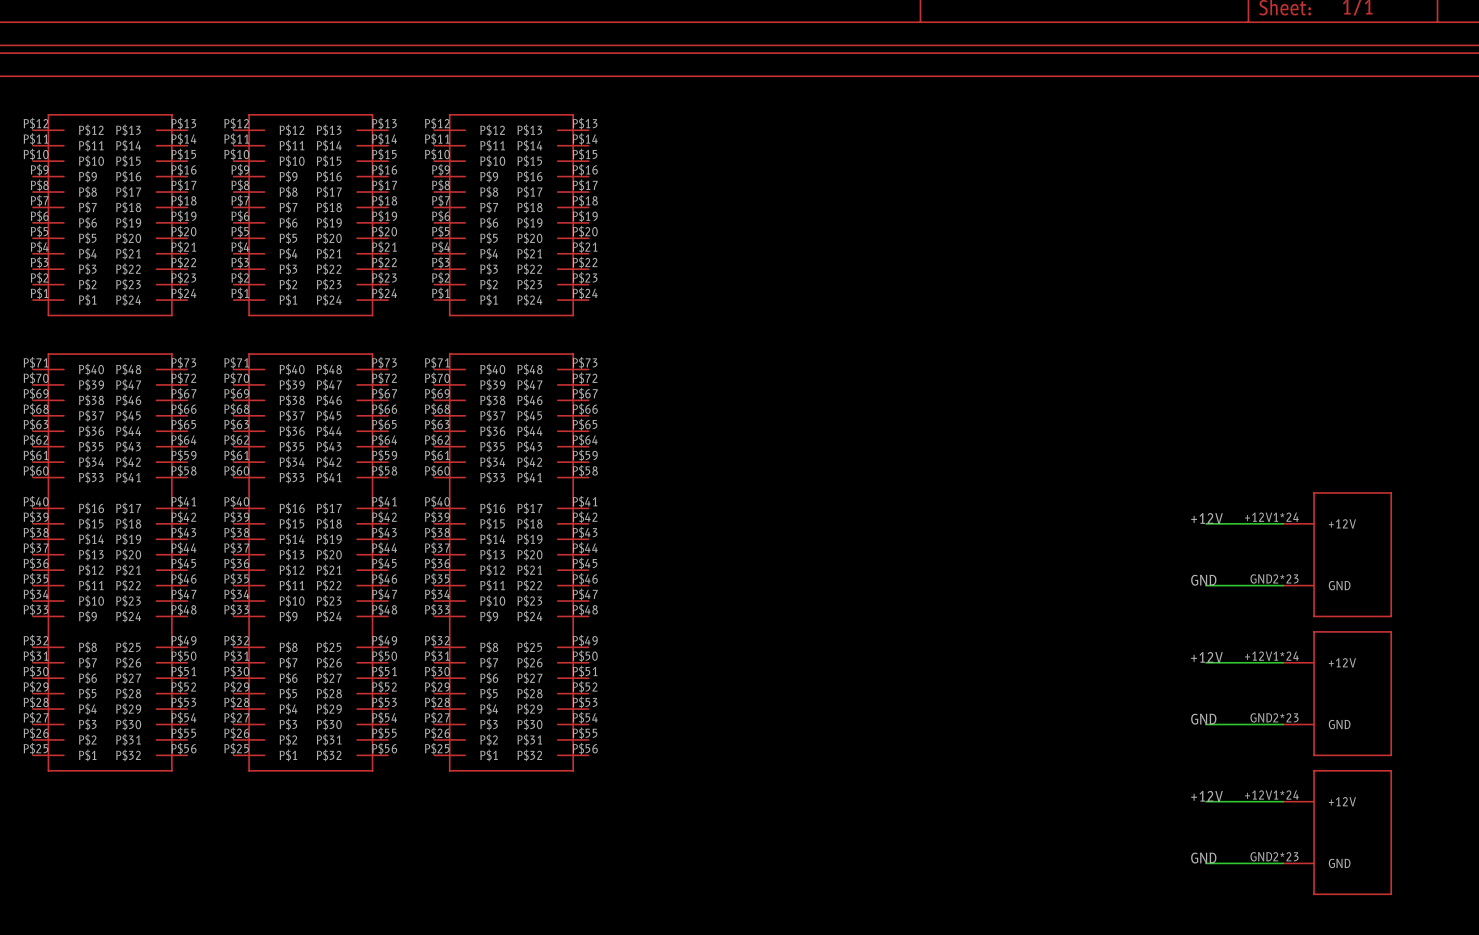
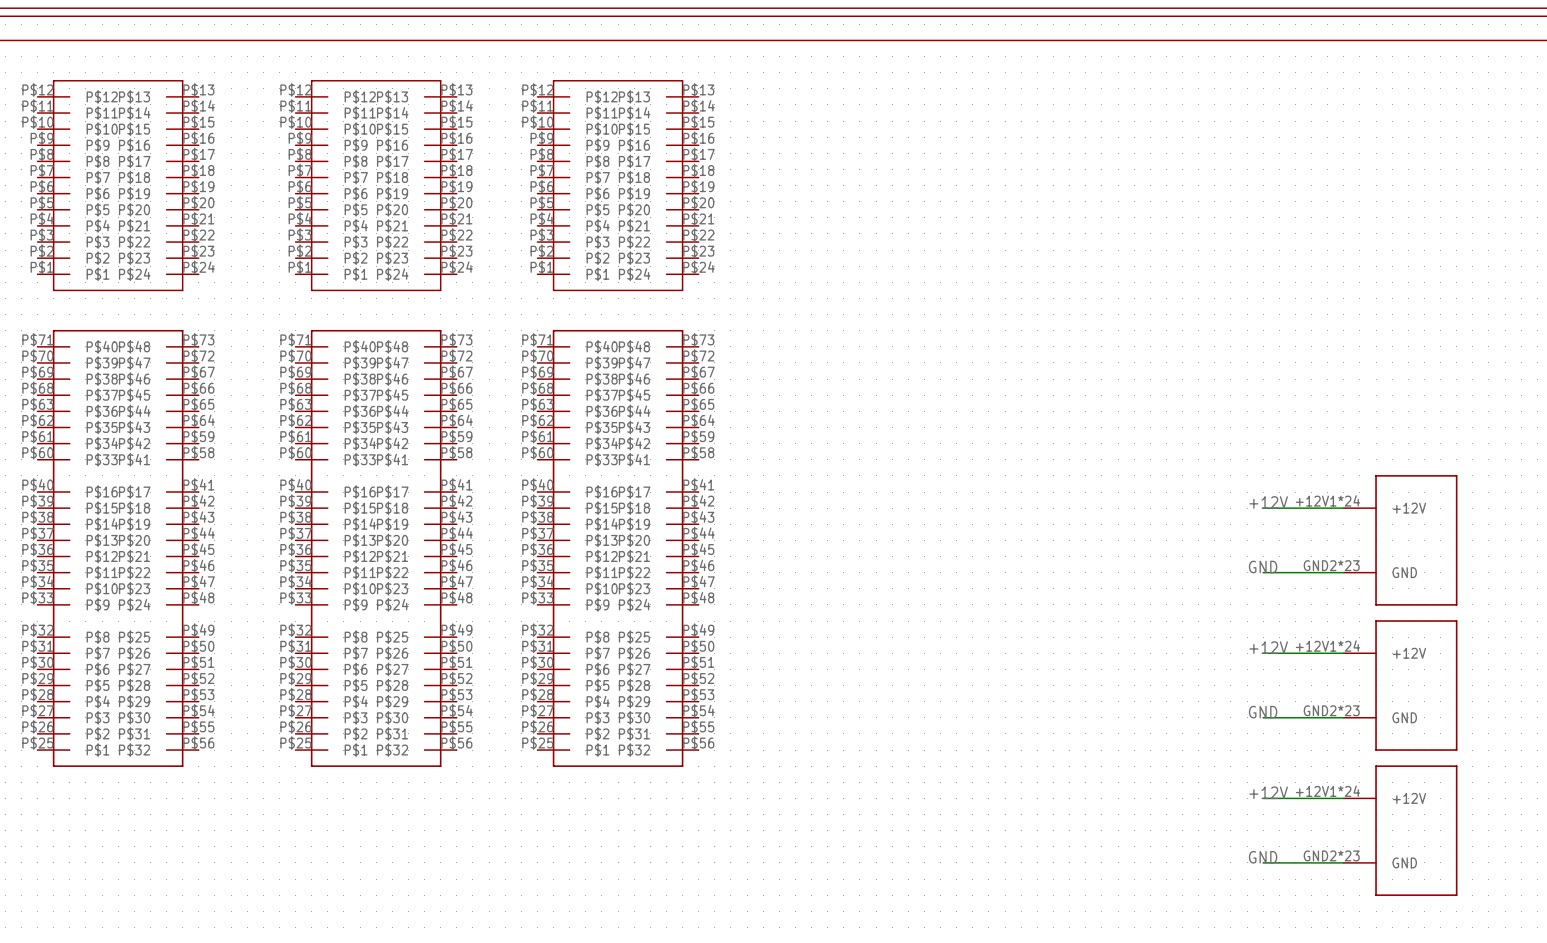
part position: (310, 215) -> (376, 185)
part: (511, 215) -> none
part: none -> (618, 185)
part position: (310, 562) -> (376, 548)
part: (511, 562) -> none
part: none -> (618, 548)

